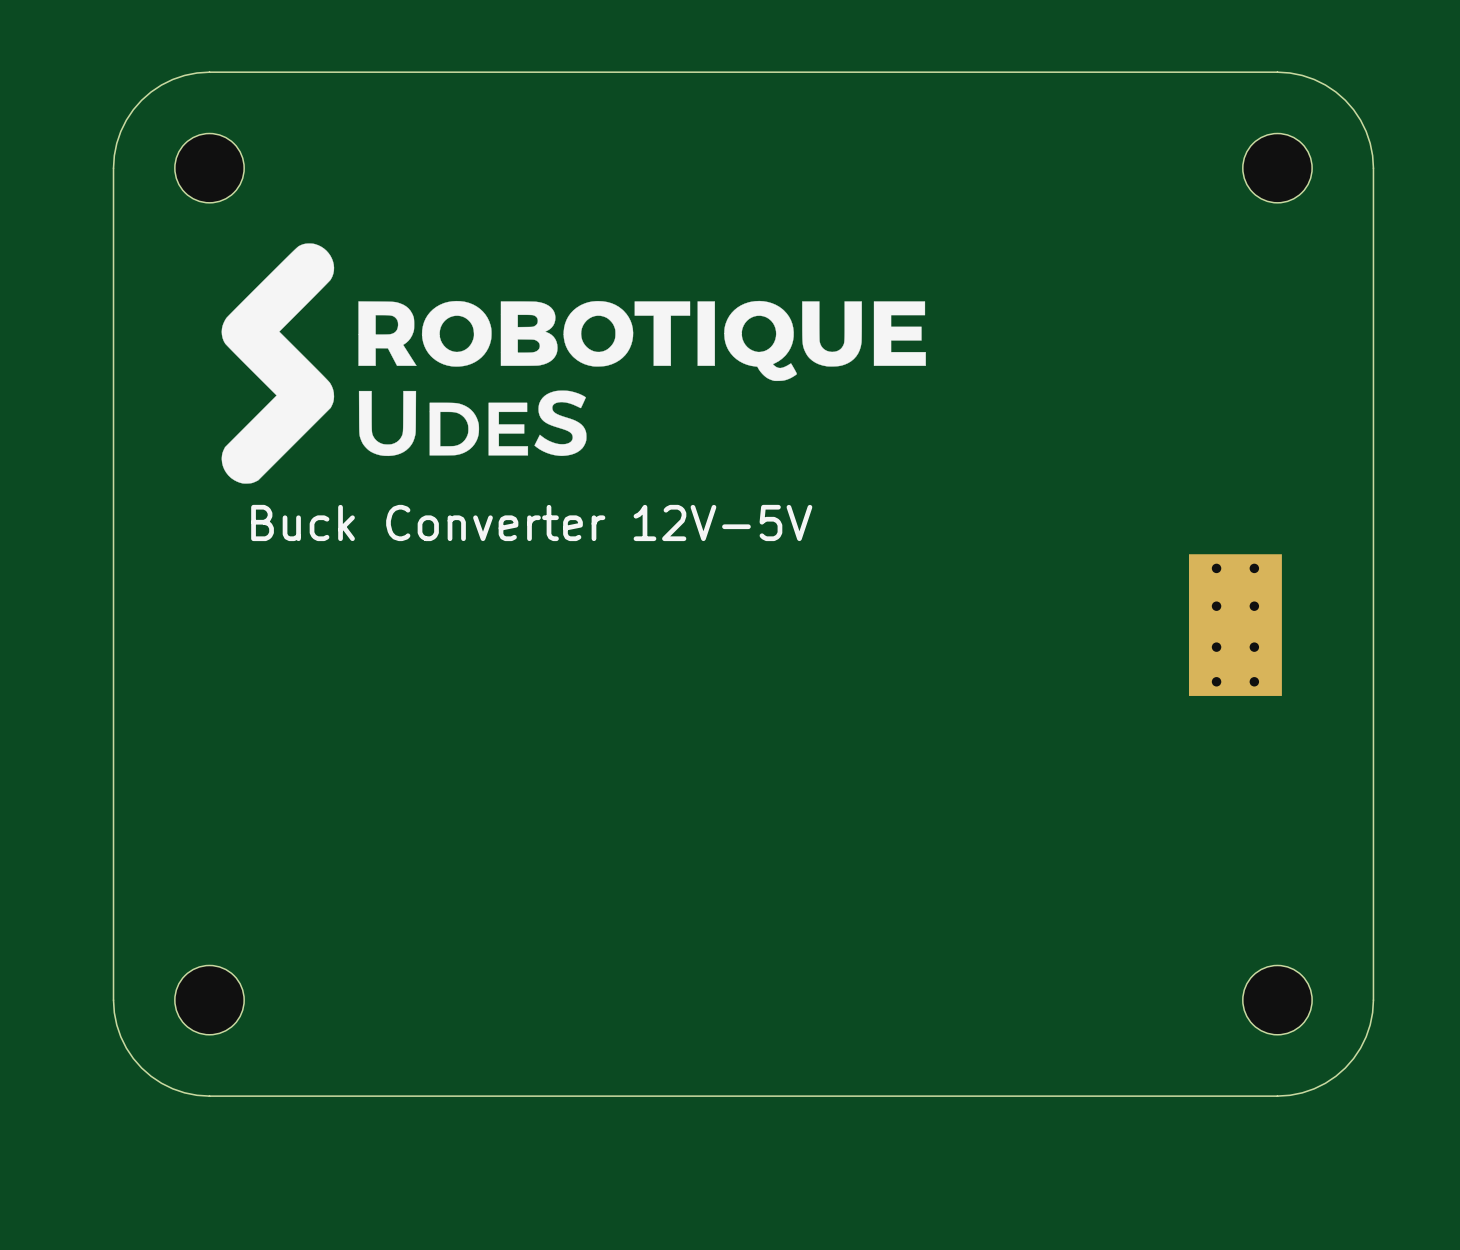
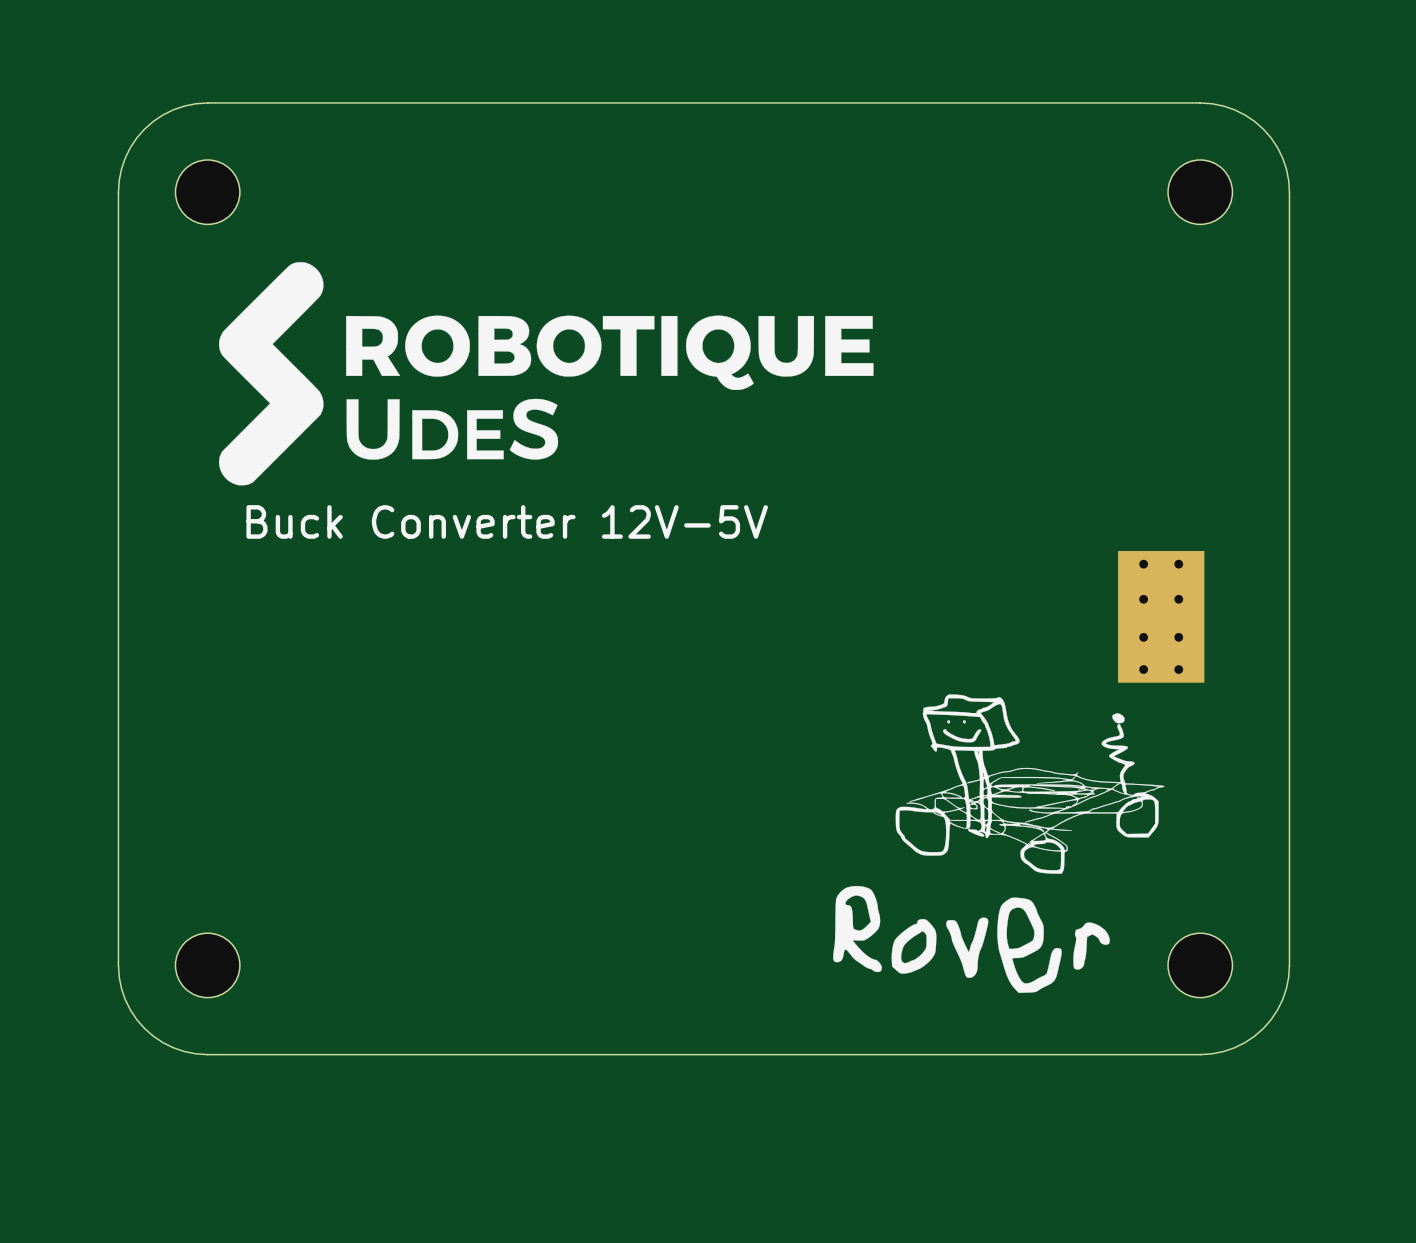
drawing: none -> [833, 694, 1165, 993]

